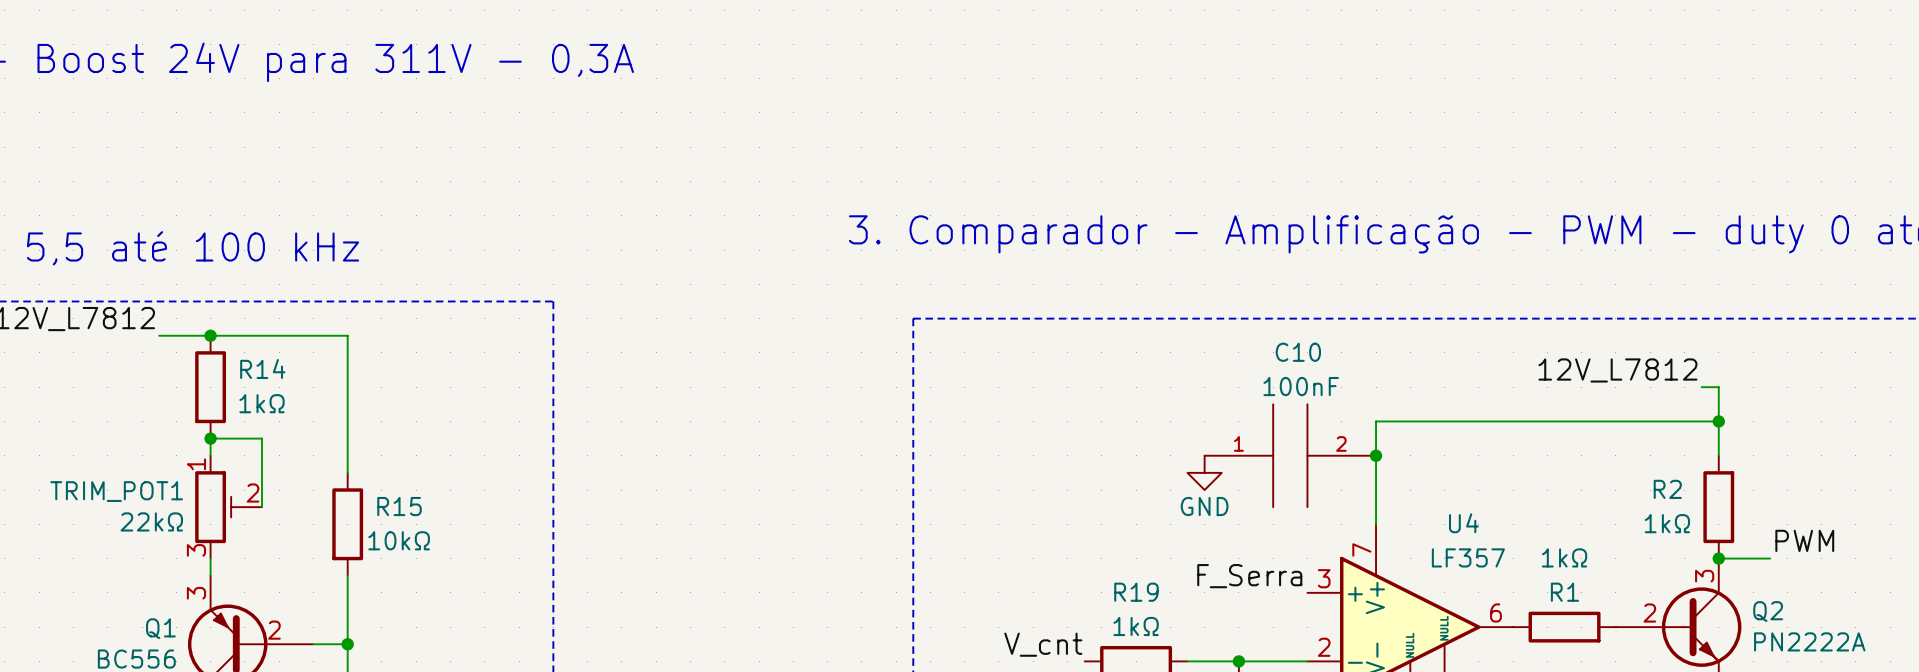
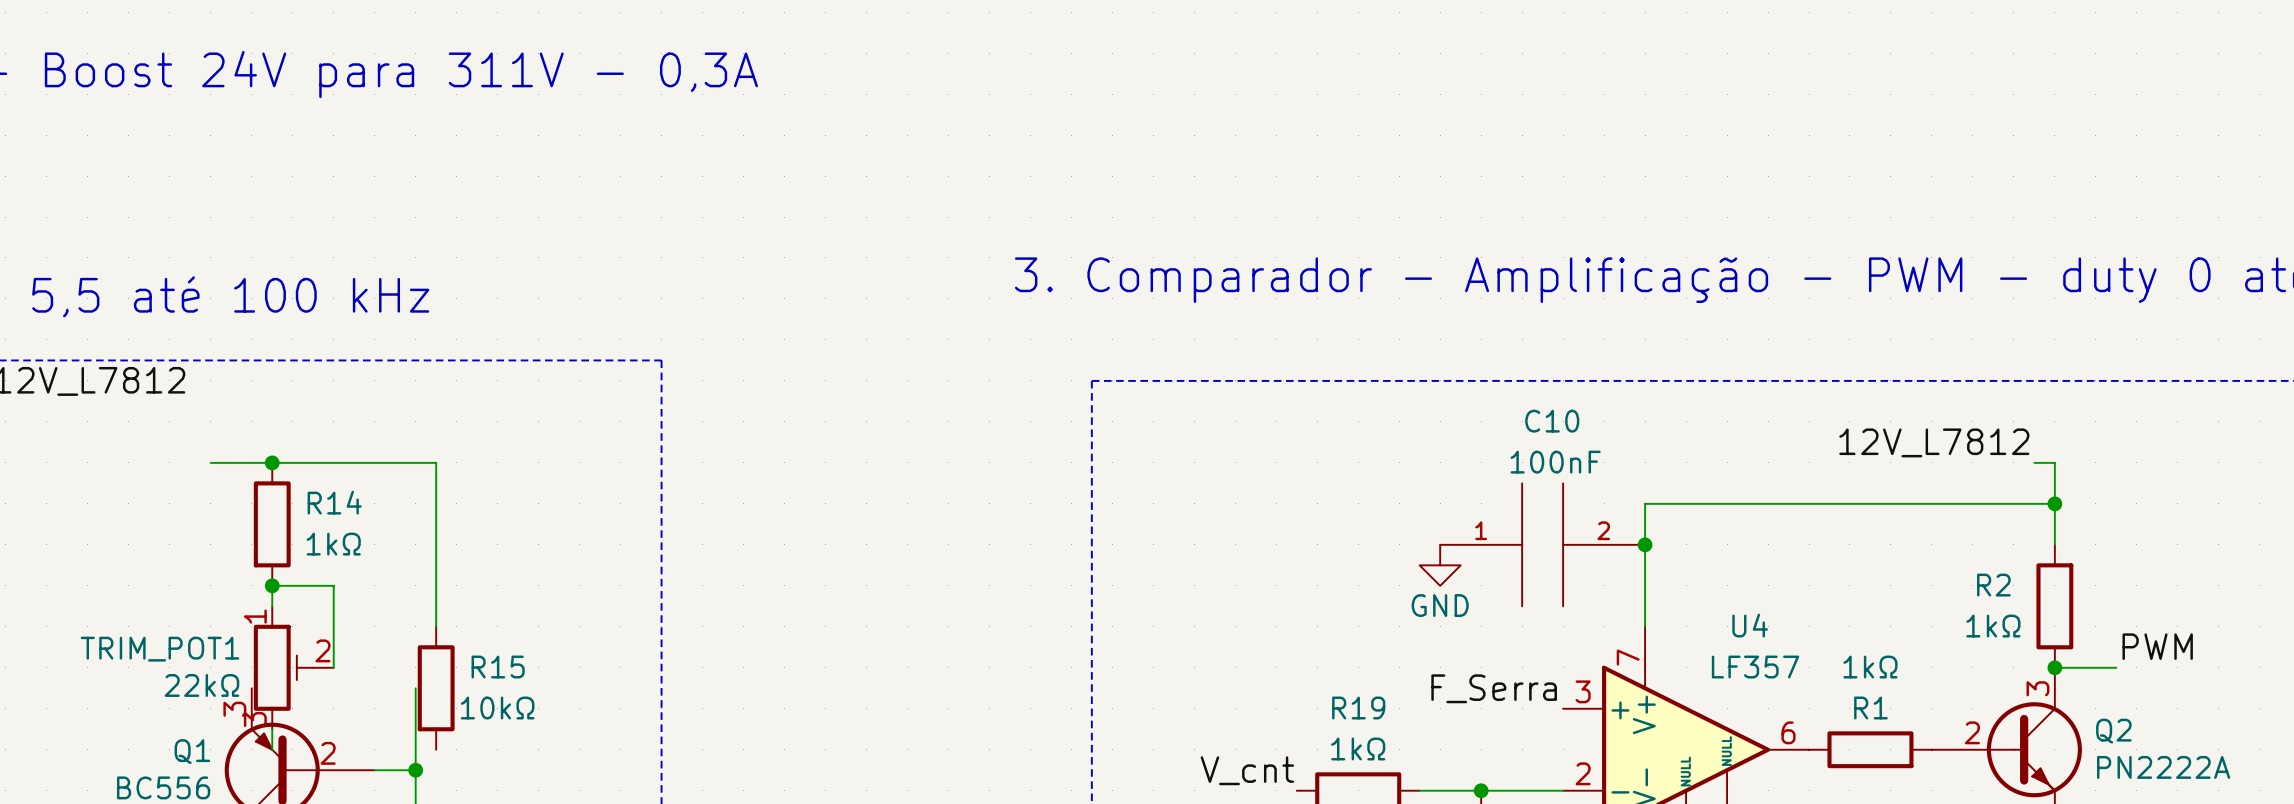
wire: (159, 335) (347, 335) (347, 472) -> (210, 462) (436, 462) (436, 626)
junction: (210, 335) -> none
R14 position: (210, 387) -> (272, 524)
junction: none -> (272, 462)
junction: (210, 438) -> none
wire: (210, 455) (210, 438) (262, 438) (262, 507) -> (272, 606) (272, 585) (333, 585) (333, 667)
junction: none -> (272, 585)
TRIM_POT1 position: (228, 507) -> (293, 667)
R15 position: (347, 524) -> (436, 688)
wire: (210, 558) (210, 575) -> (272, 729) (272, 749)

